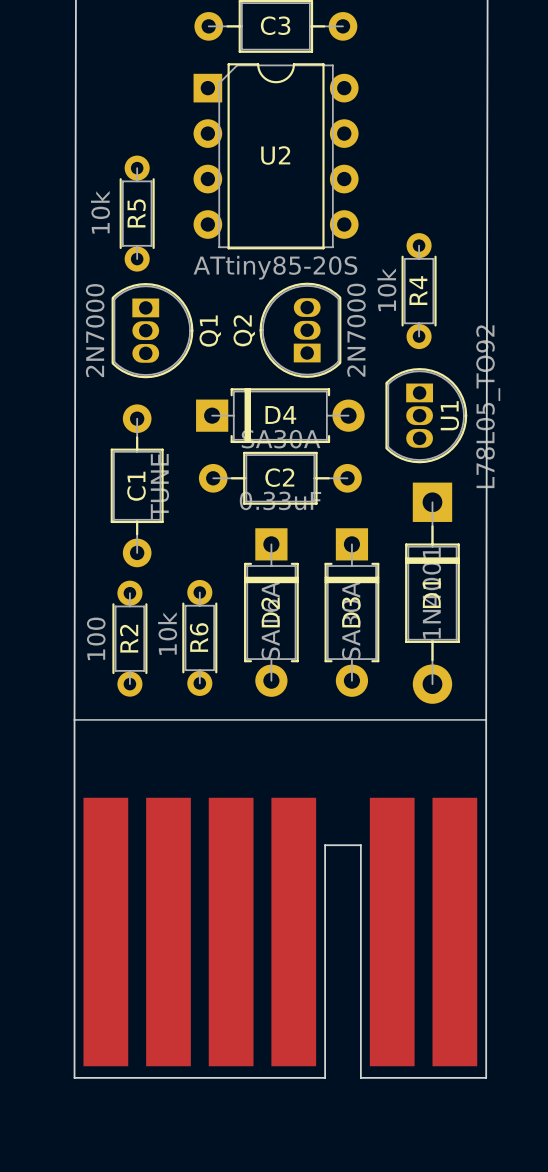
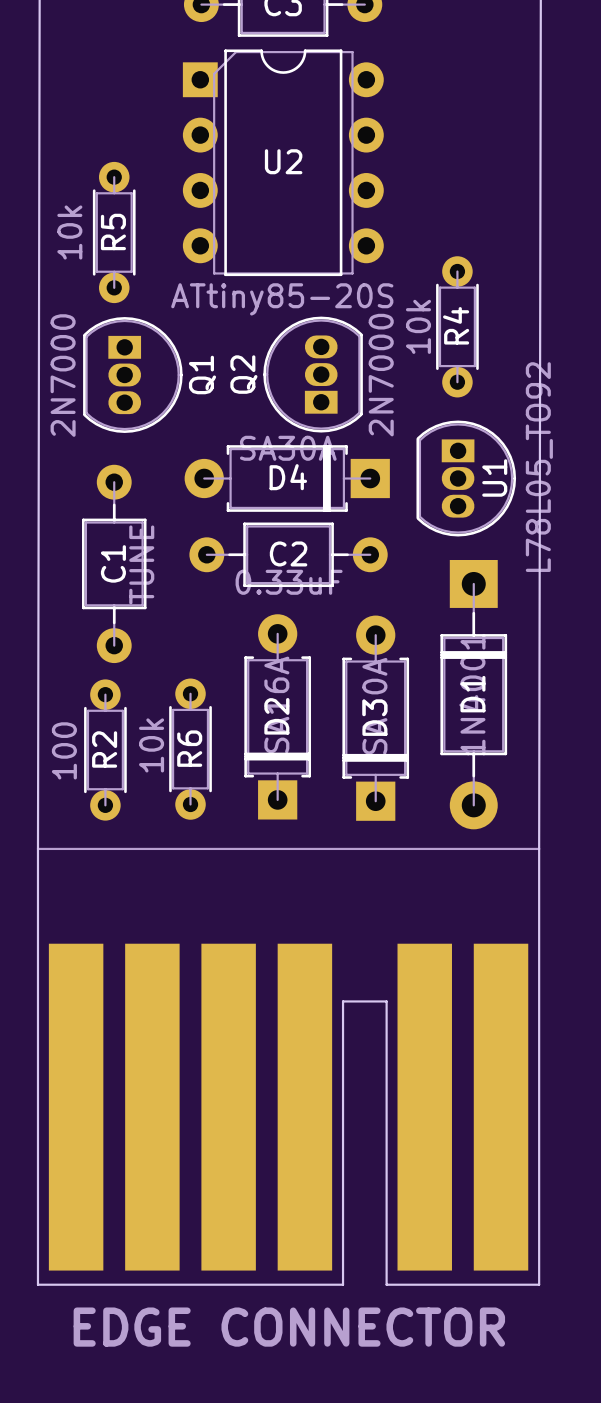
D4 rotation: 0° (280, 415) -> 180° (287, 478)
D2 rotation: 0° (271, 612) -> 180° (277, 716)
D3 rotation: 0° (351, 612) -> 180° (375, 718)
text: none -> EDGE CONNECTOR (289, 1327)

